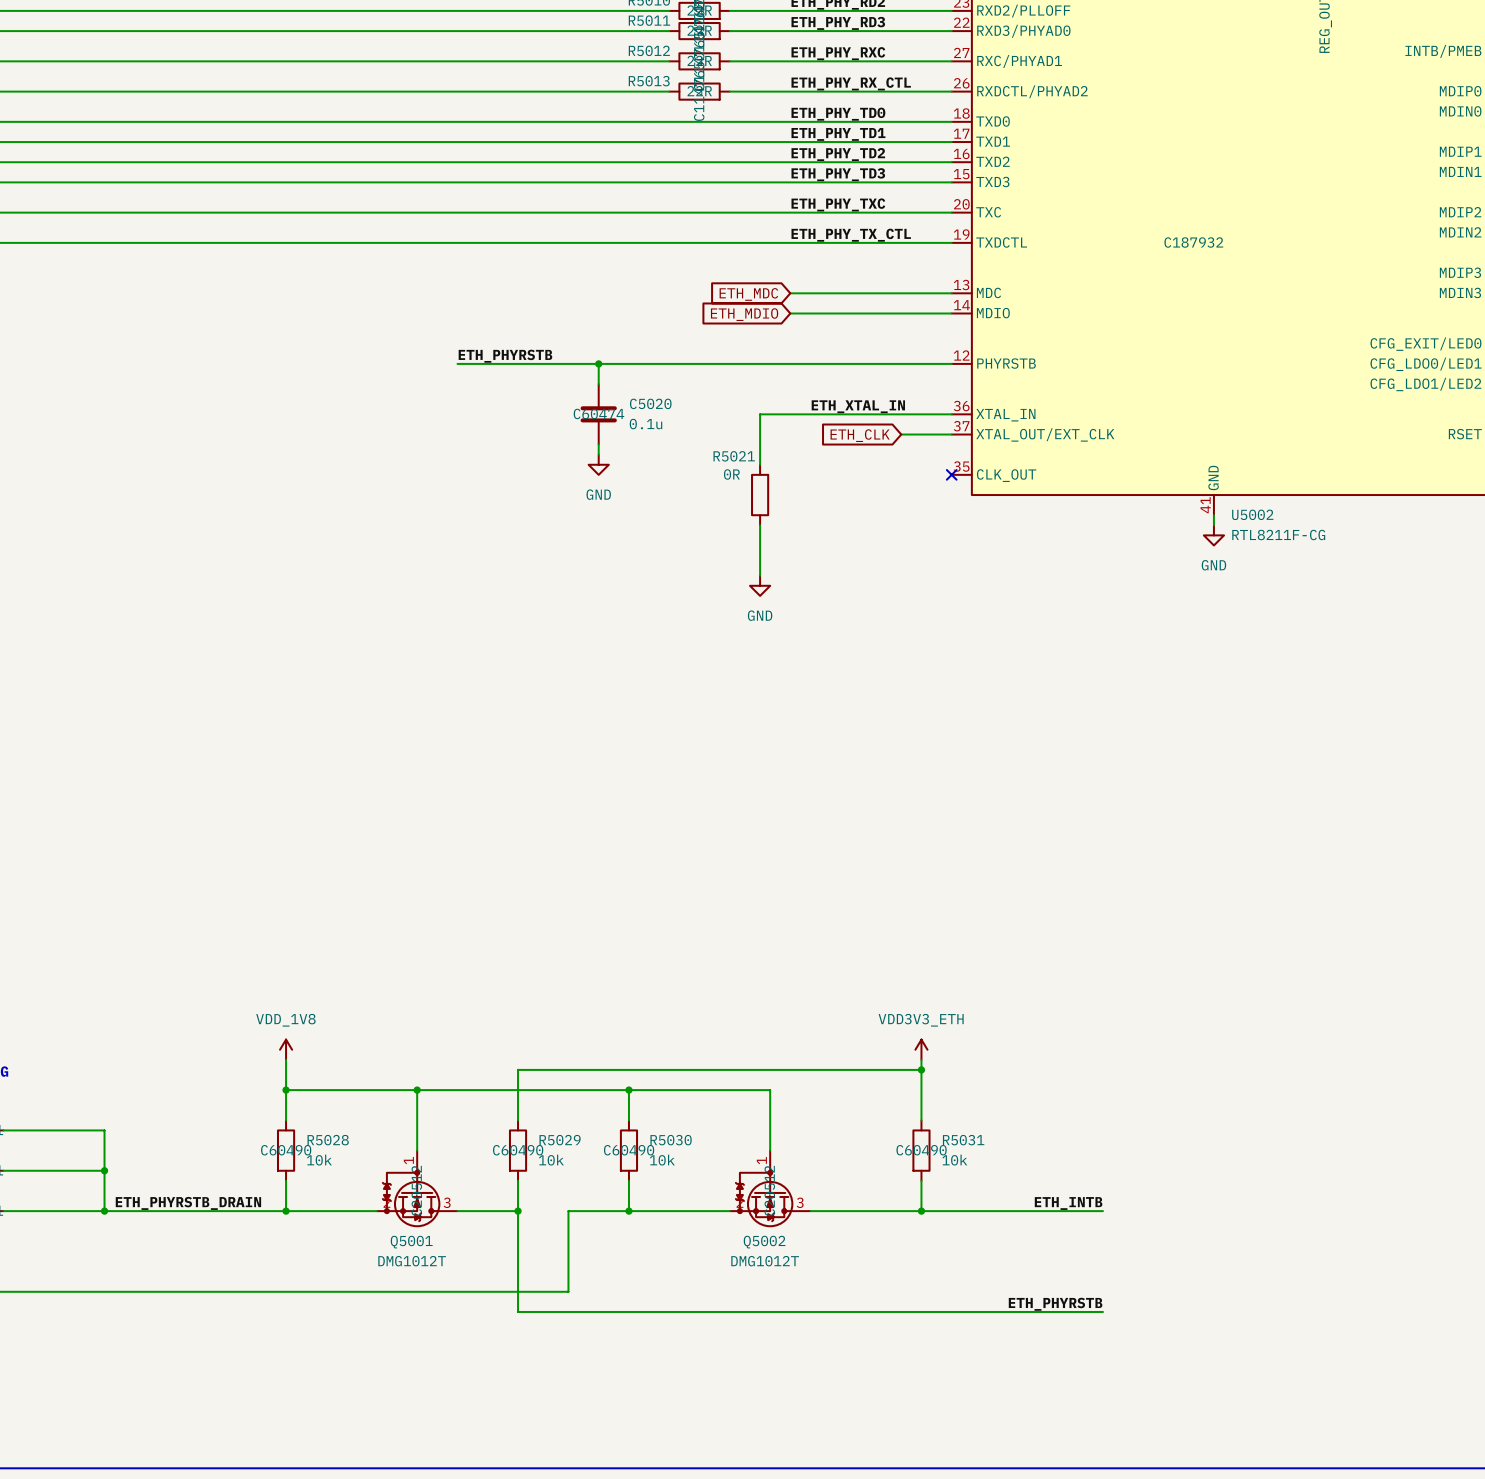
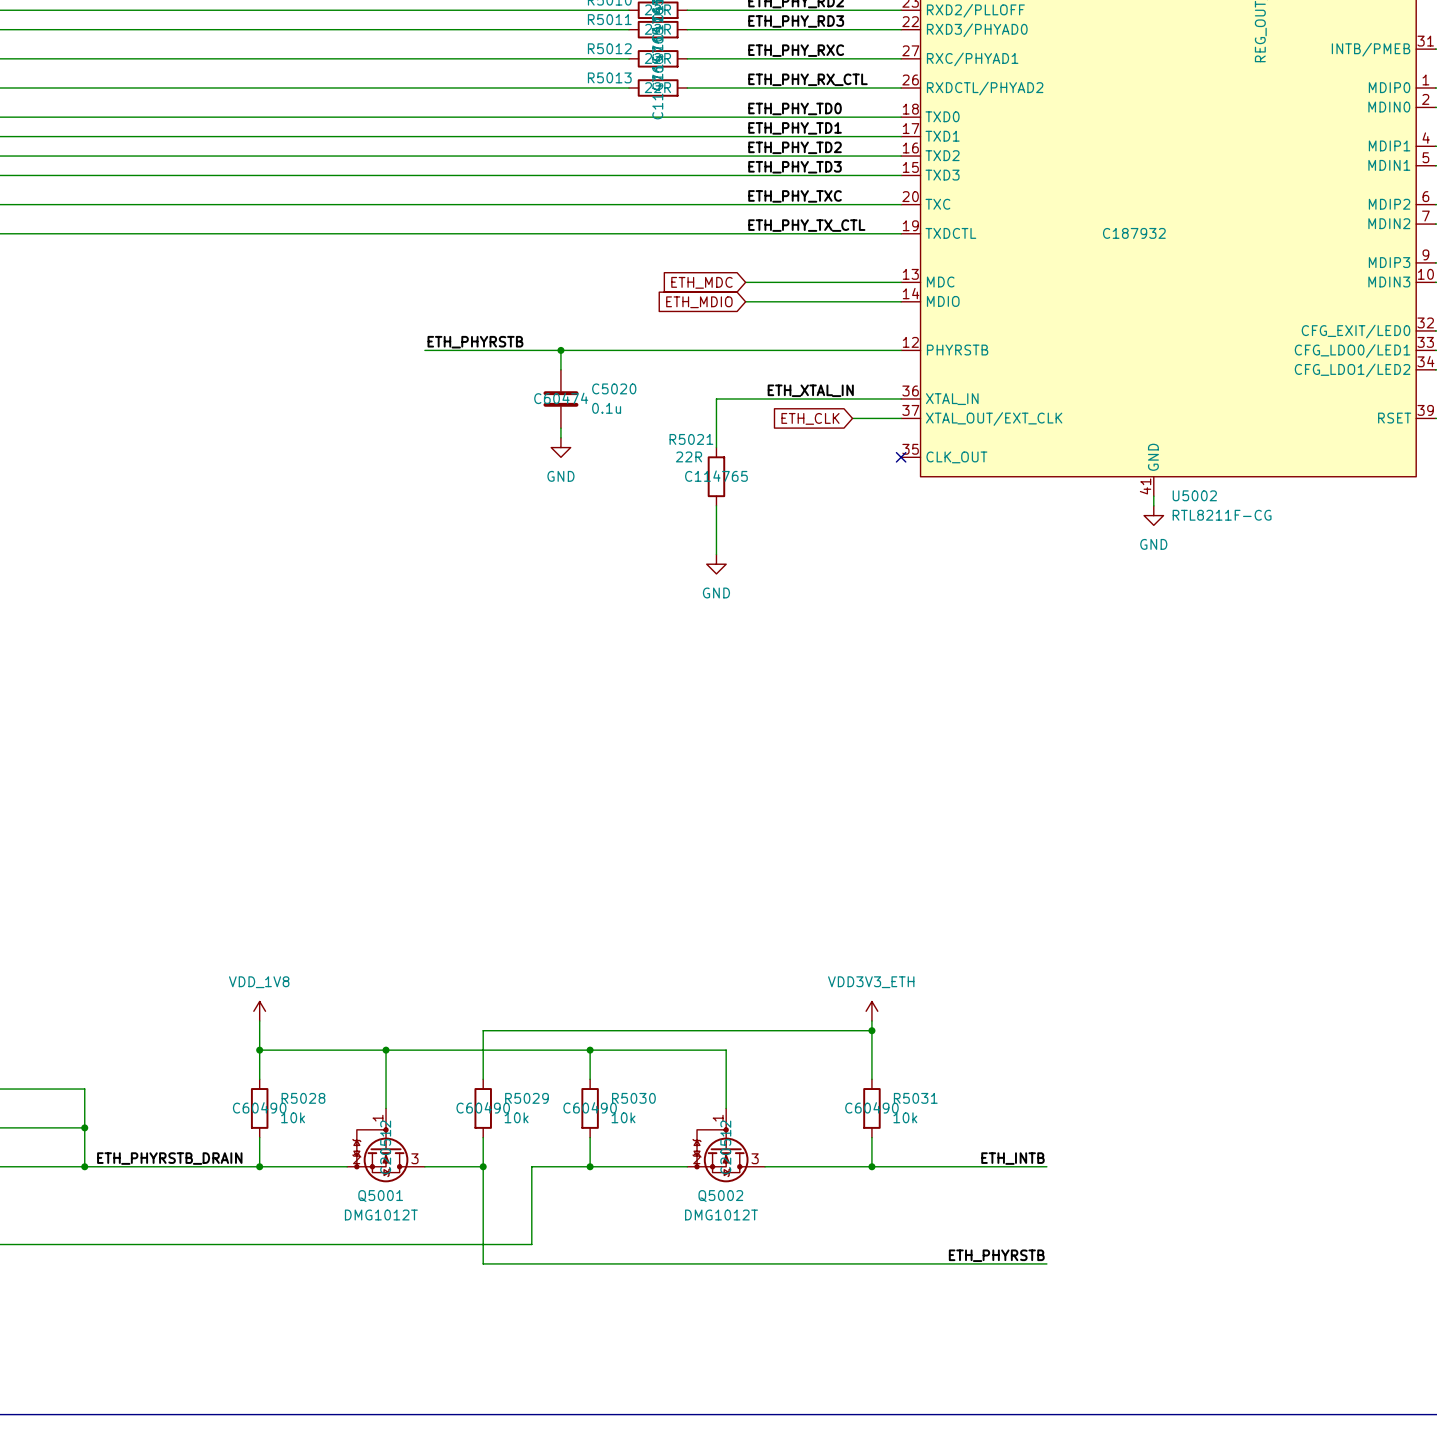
R5021 value: 0R (731, 474) -> 22R (689, 456)
R5021 text: none -> C114765 (716, 476)

